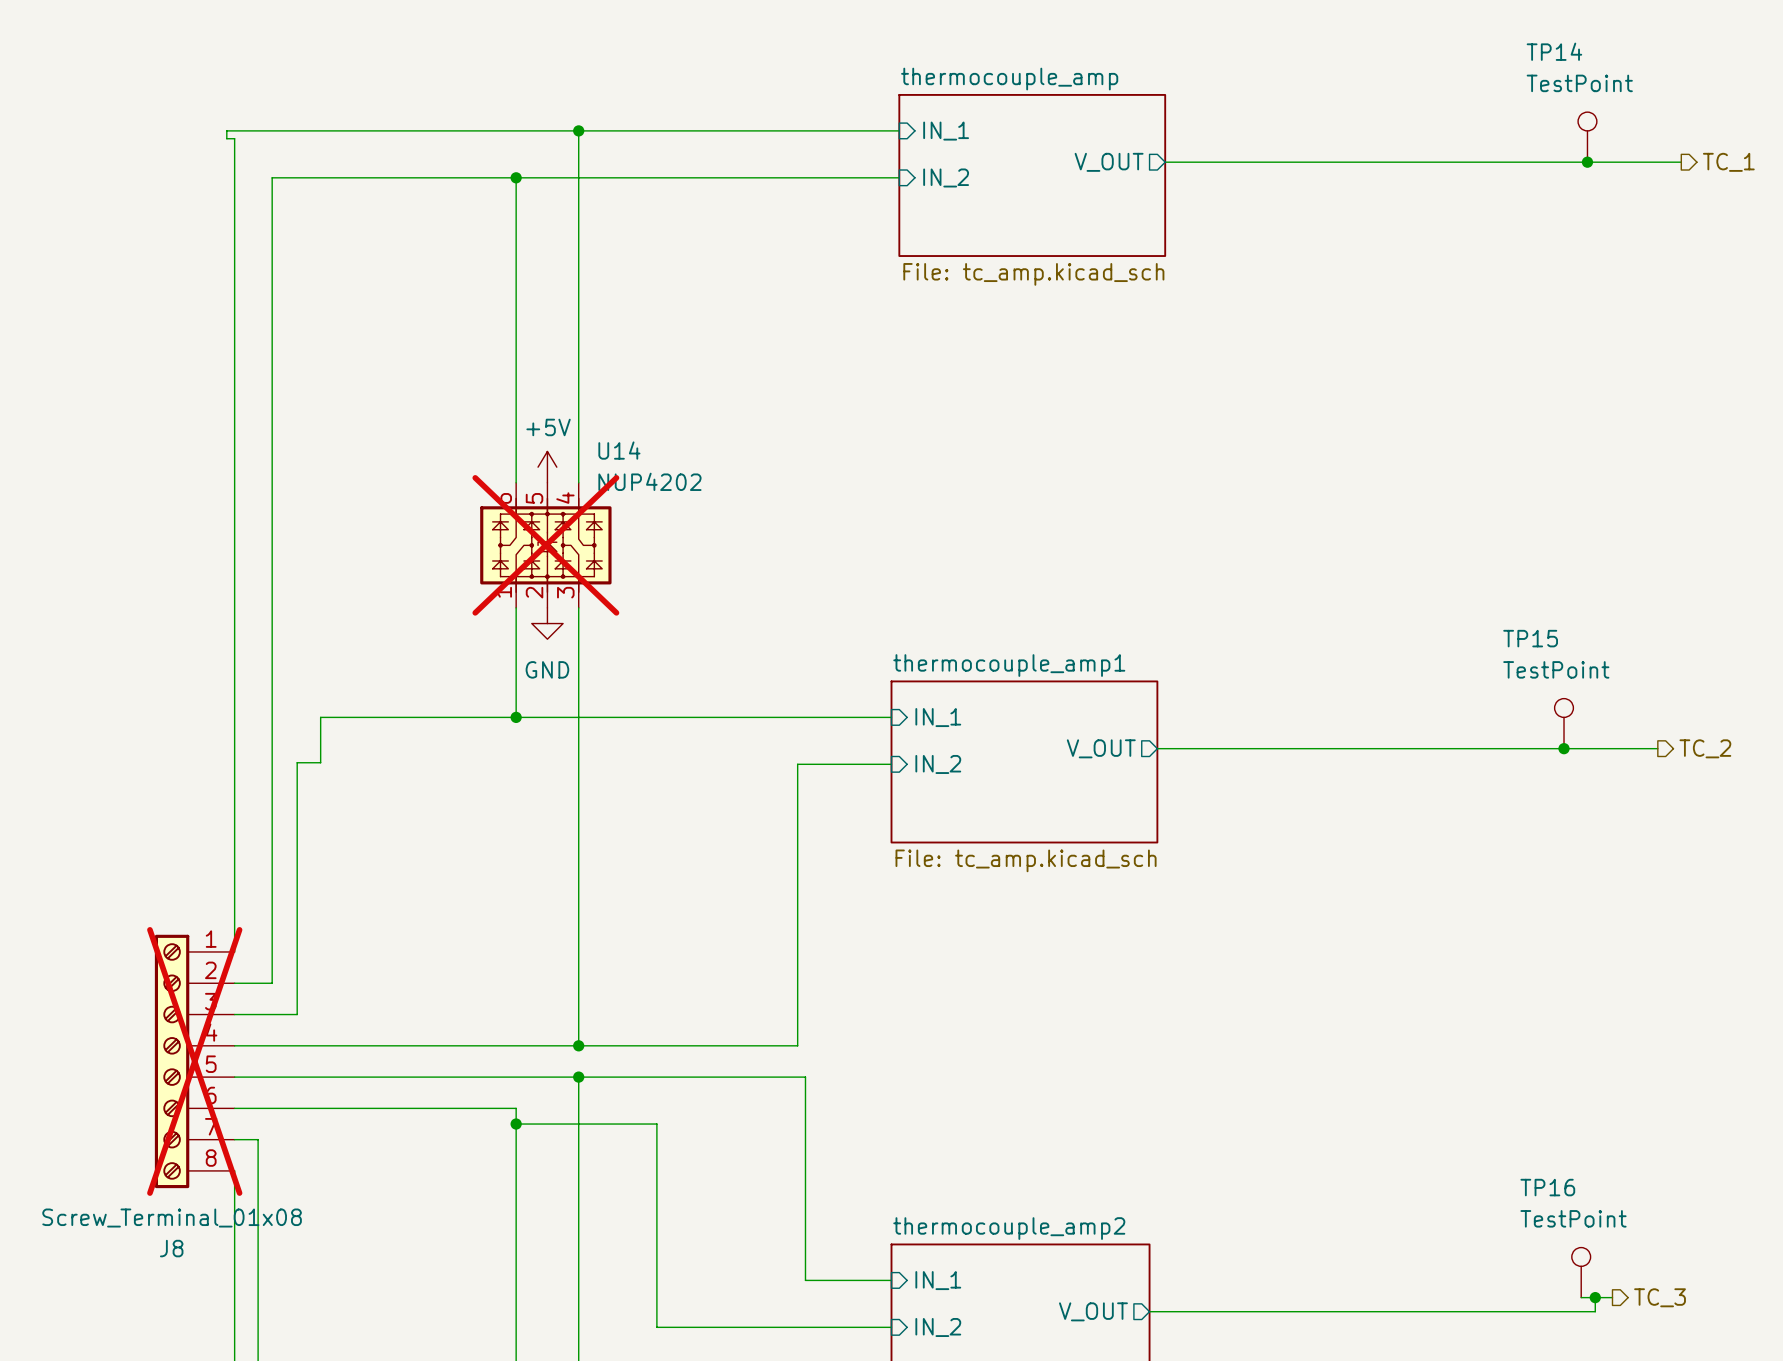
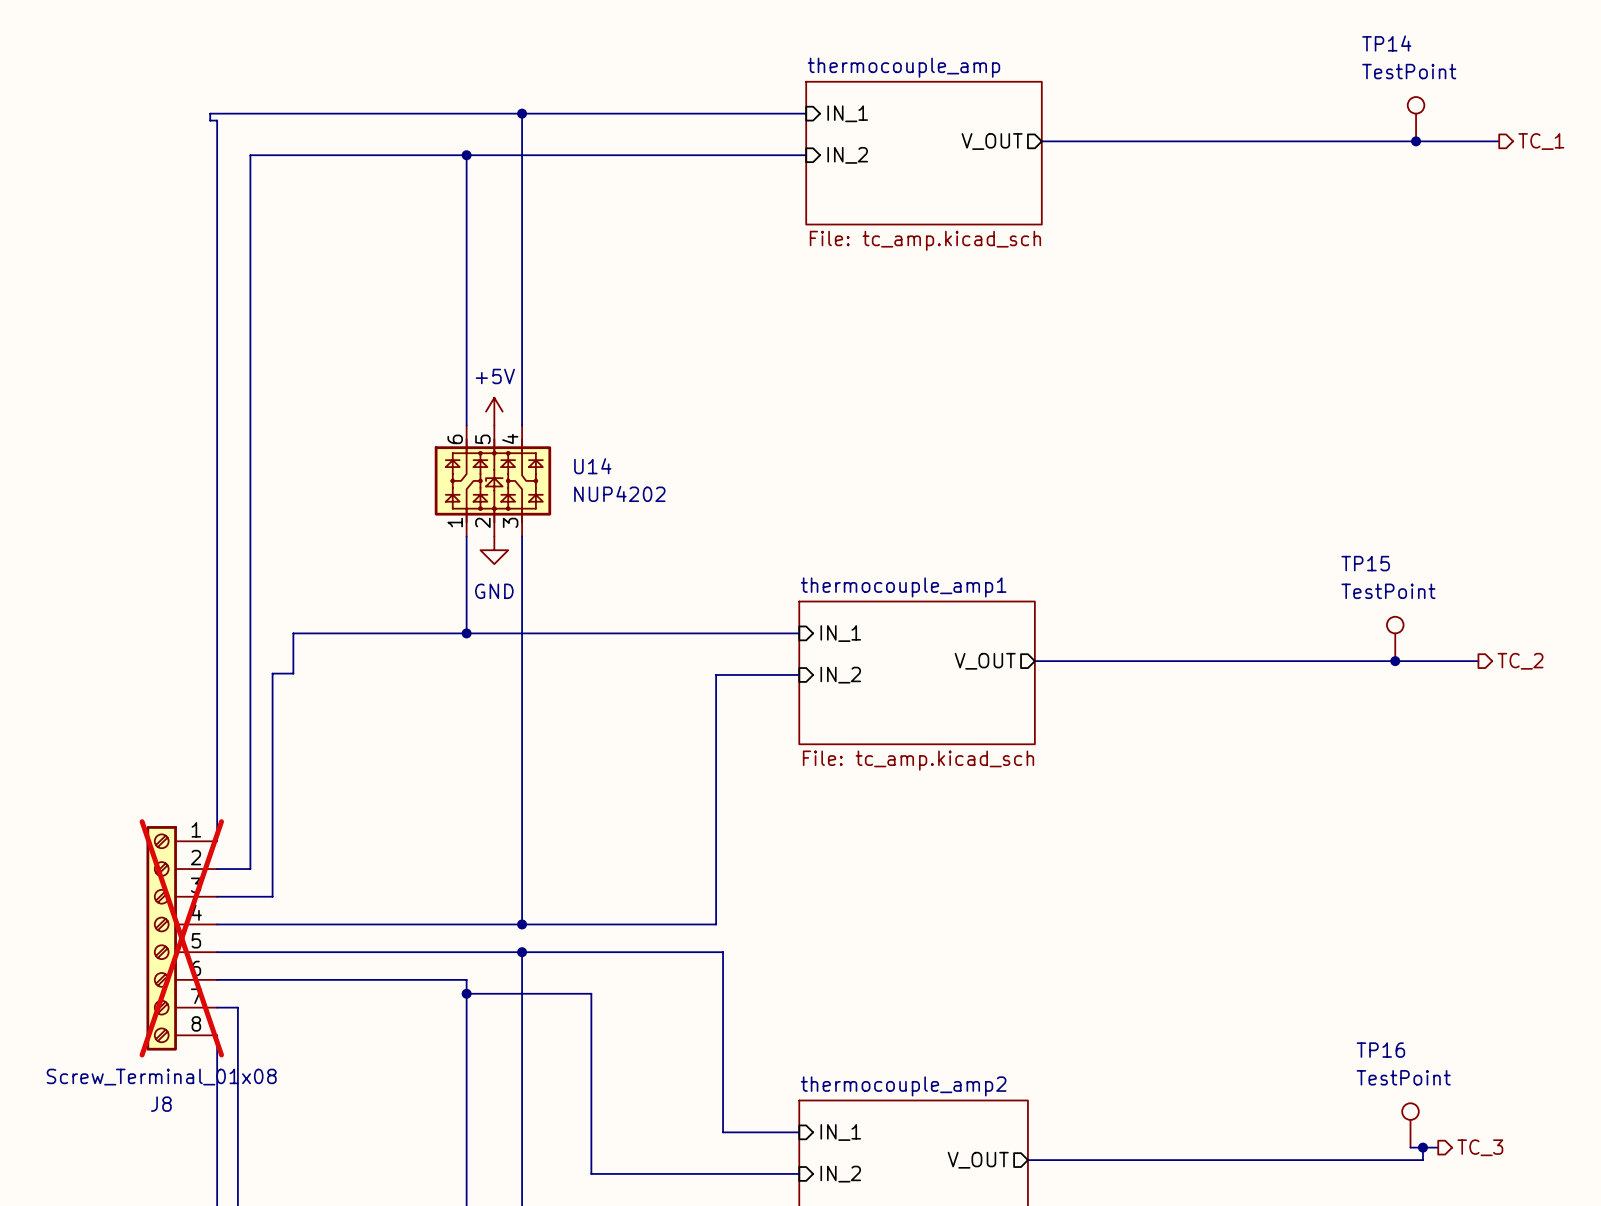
U14 name position: U14 (619, 450) -> U14 (592, 466)
U14 value position: NUP4202 (649, 481) -> NUP4202 (619, 493)
U14 do-not-place cross: (545, 545) -> none

